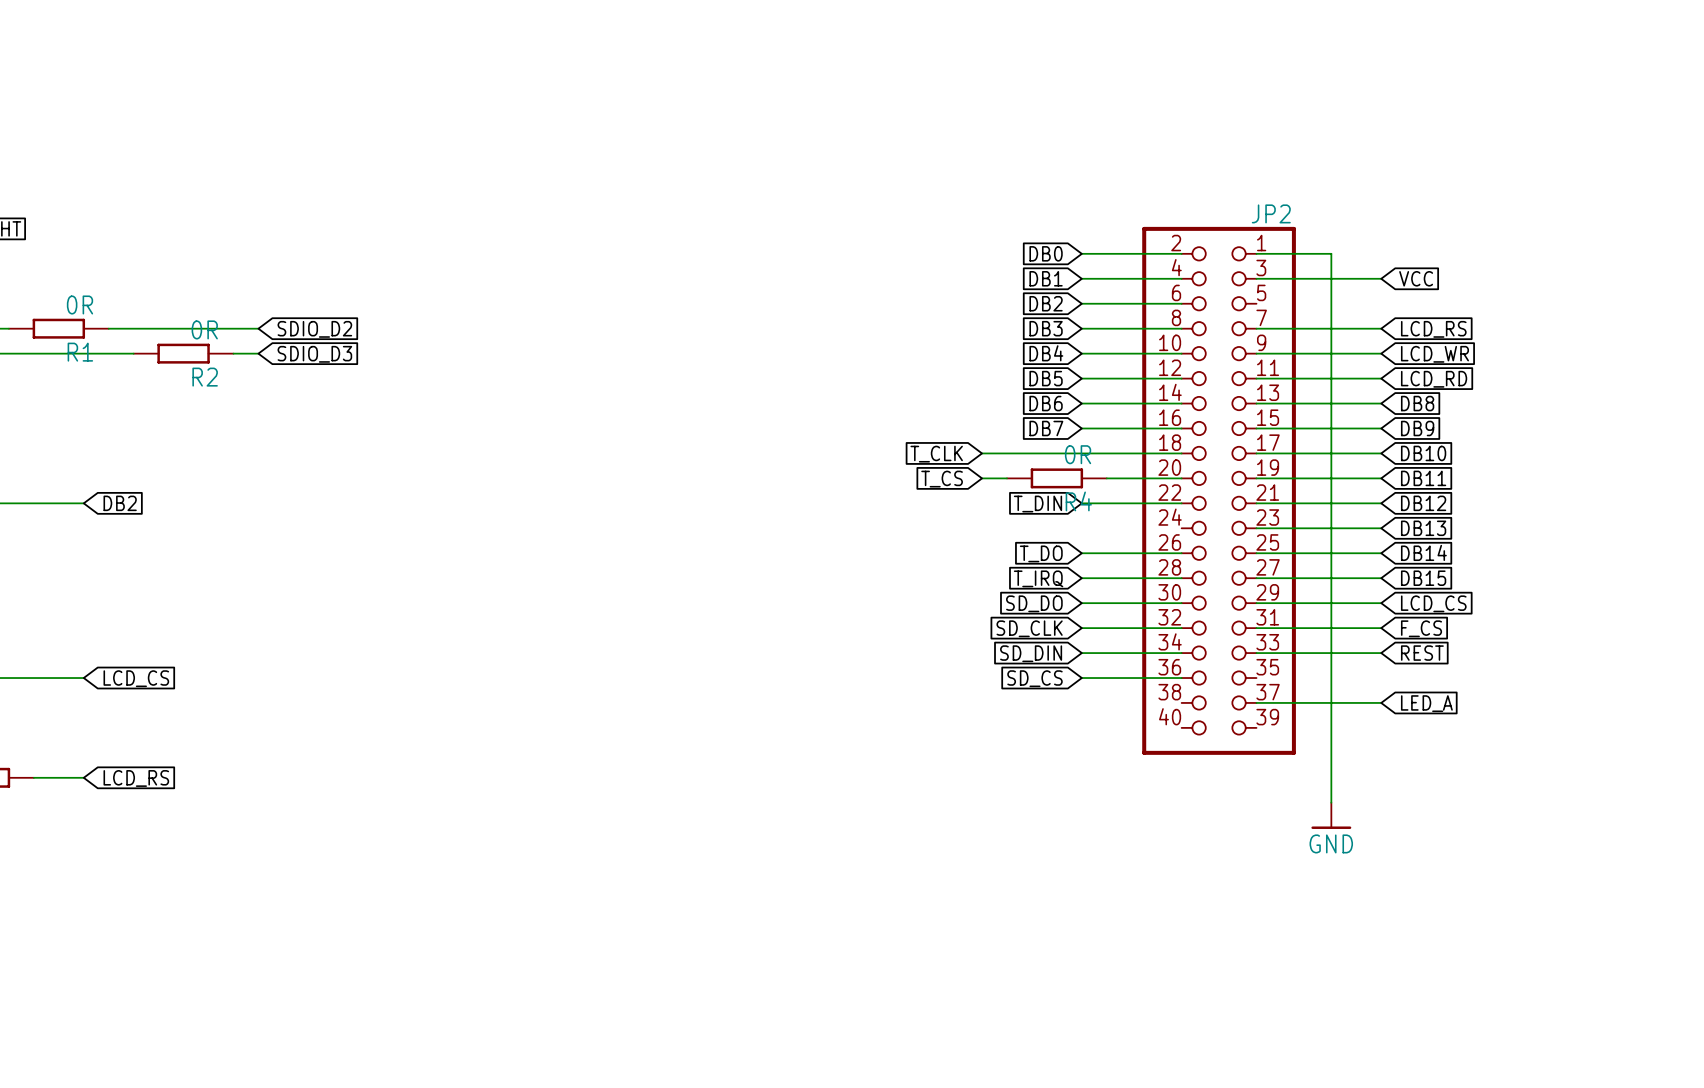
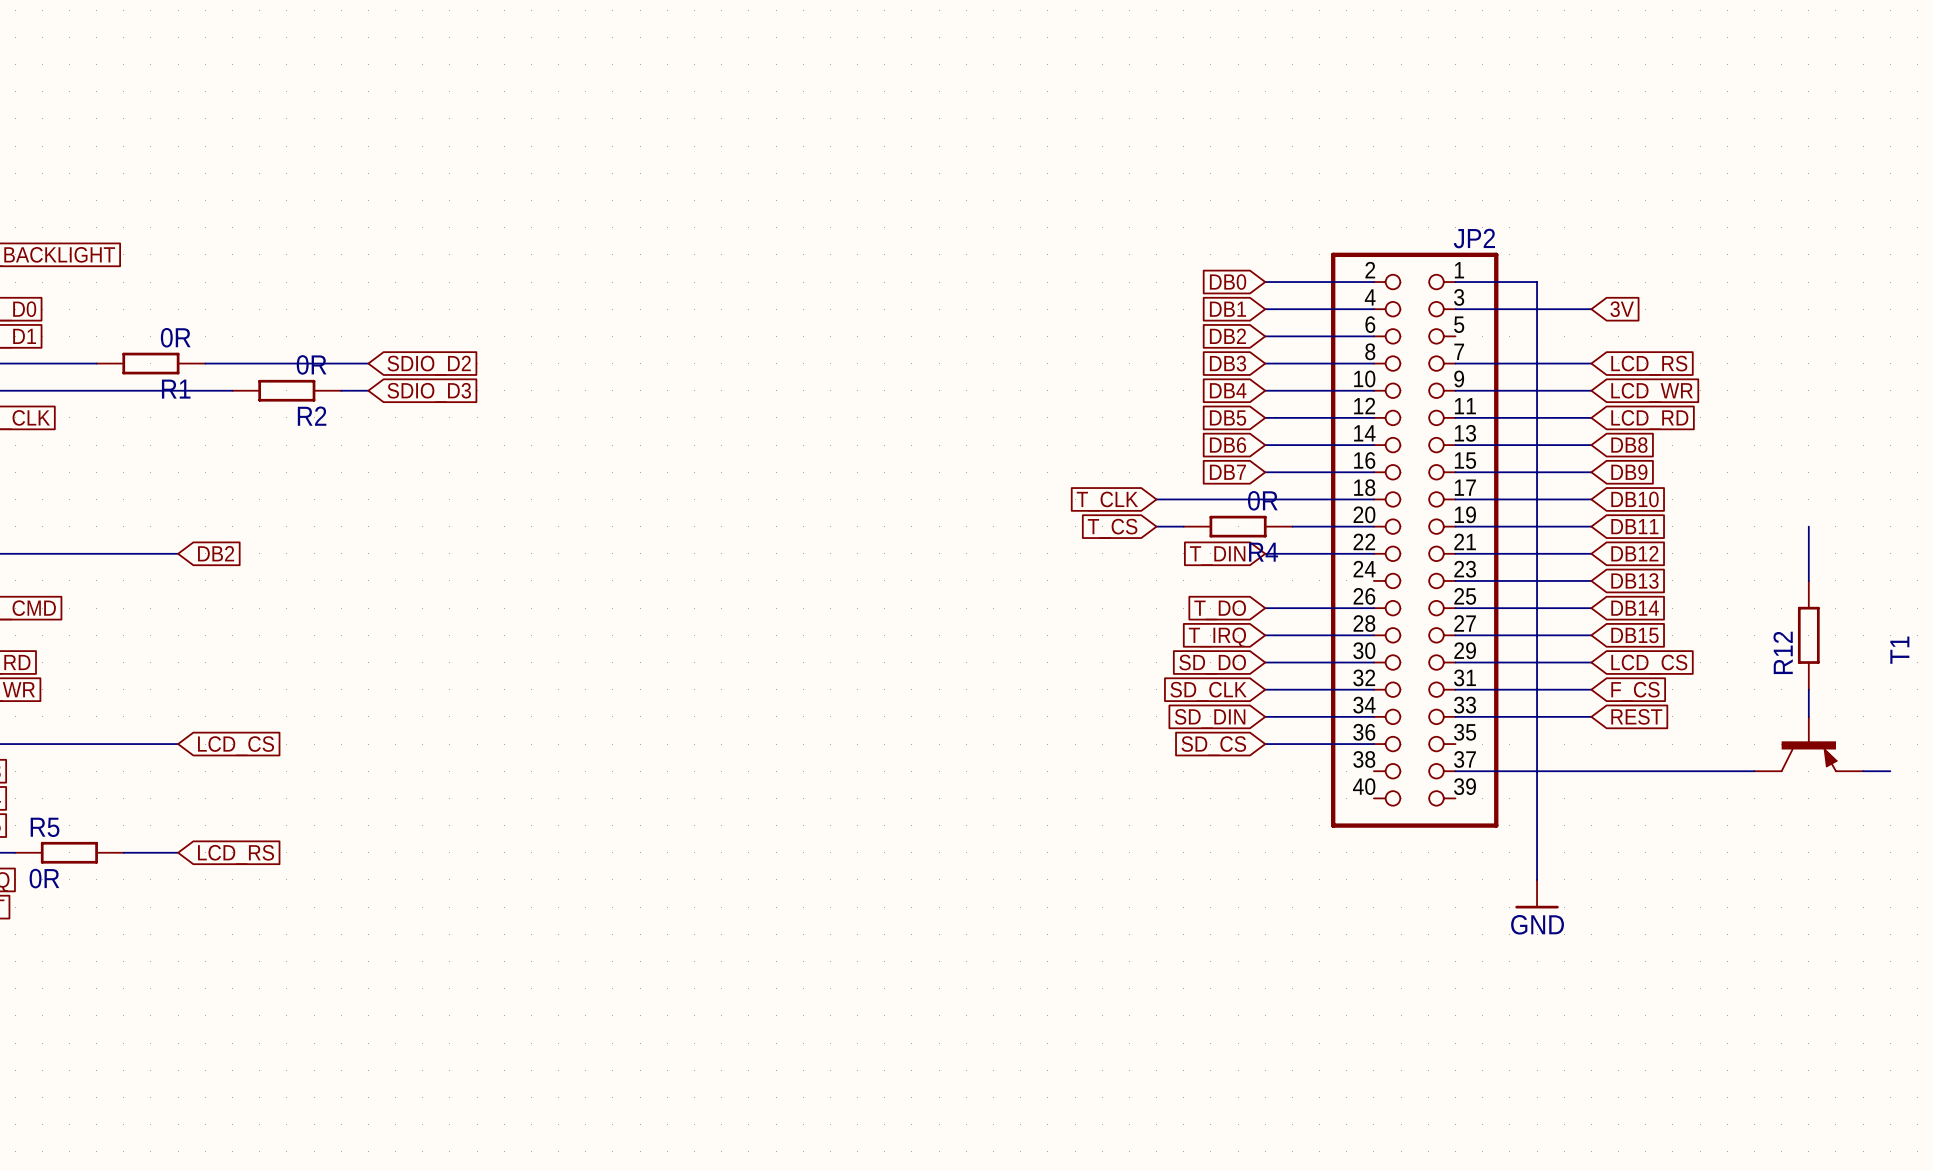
global label: VCC (1416, 278) -> 3V (1622, 309)
wire: none -> (1808, 526) (1808, 580)
R12: none -> (1808, 635)
wire: none -> (1808, 689) (1808, 716)
T1: none -> (1808, 744)
wire: none -> (1591, 771) (1754, 771)
wire: none -> (1863, 771) (1890, 771)
global label: LED_A (1426, 703) -> none

